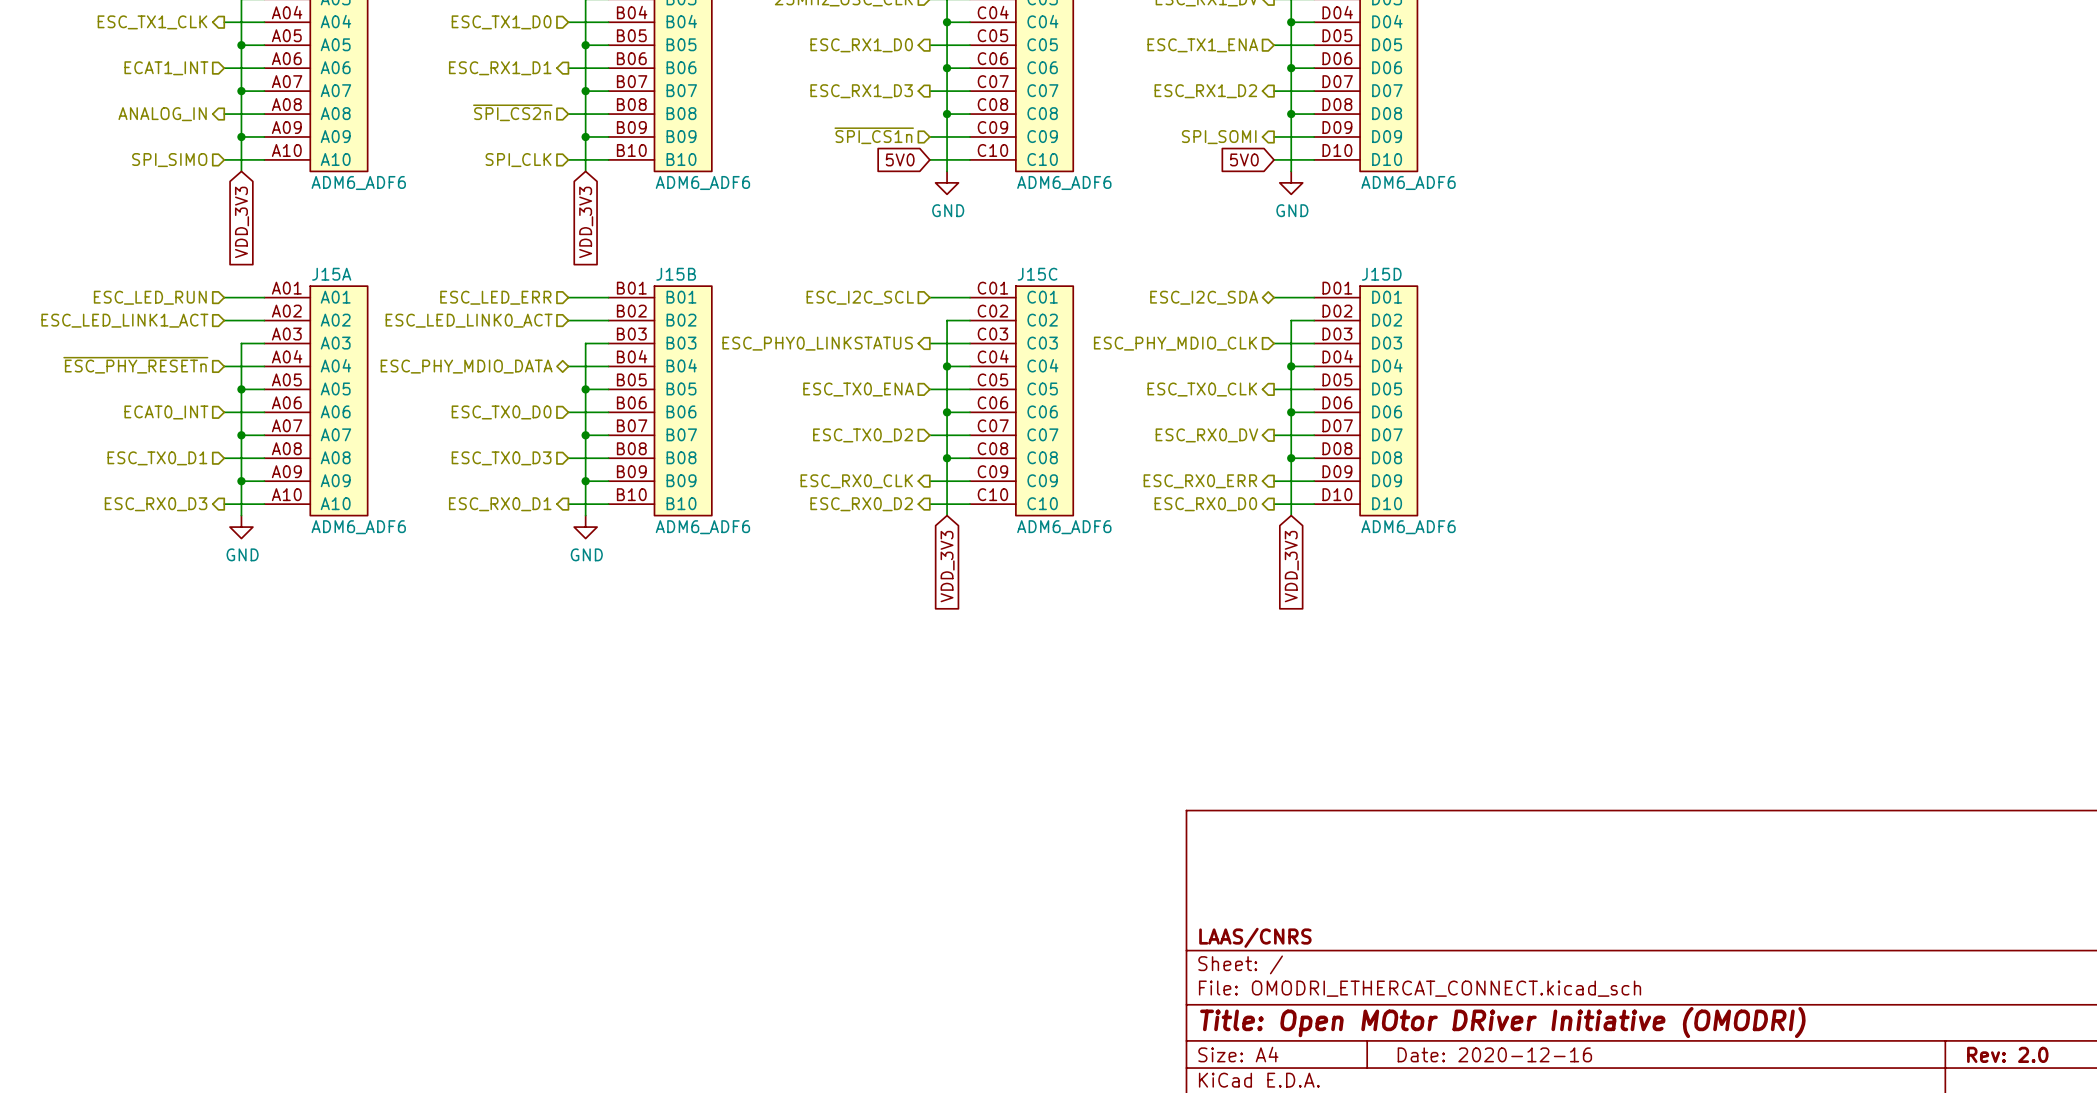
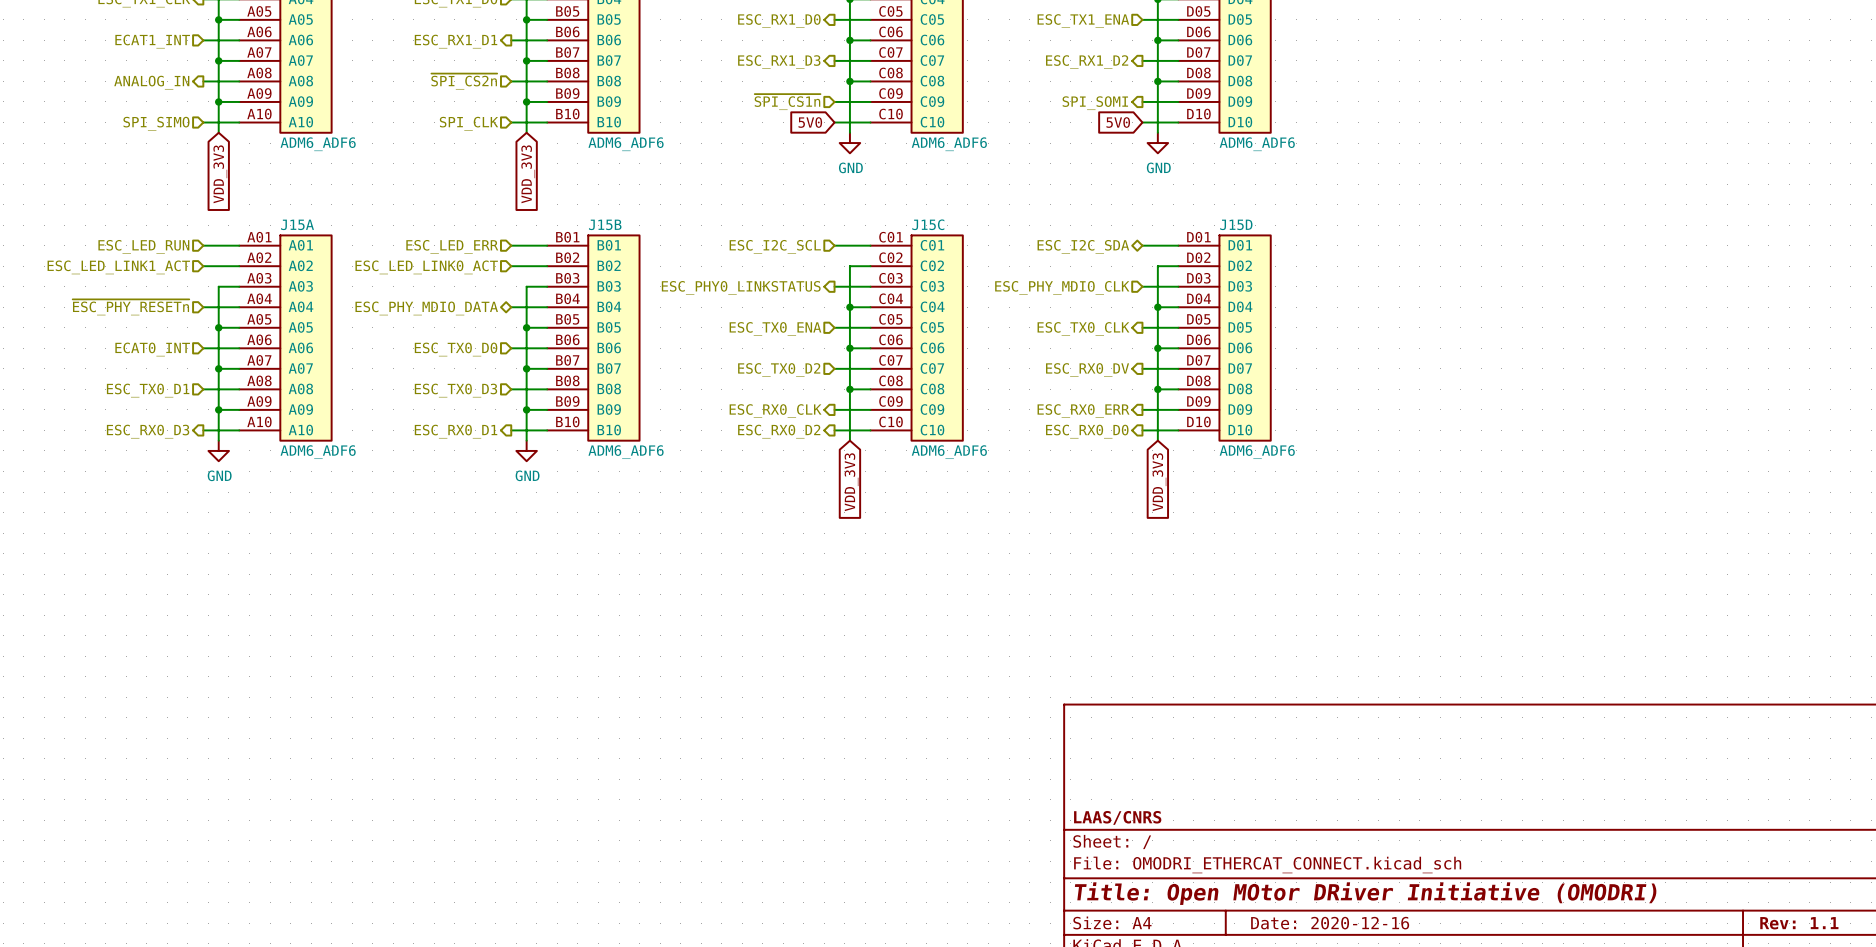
title block: Rev: 2.0 (2007, 1054) -> Rev: 1.1 (1799, 923)

